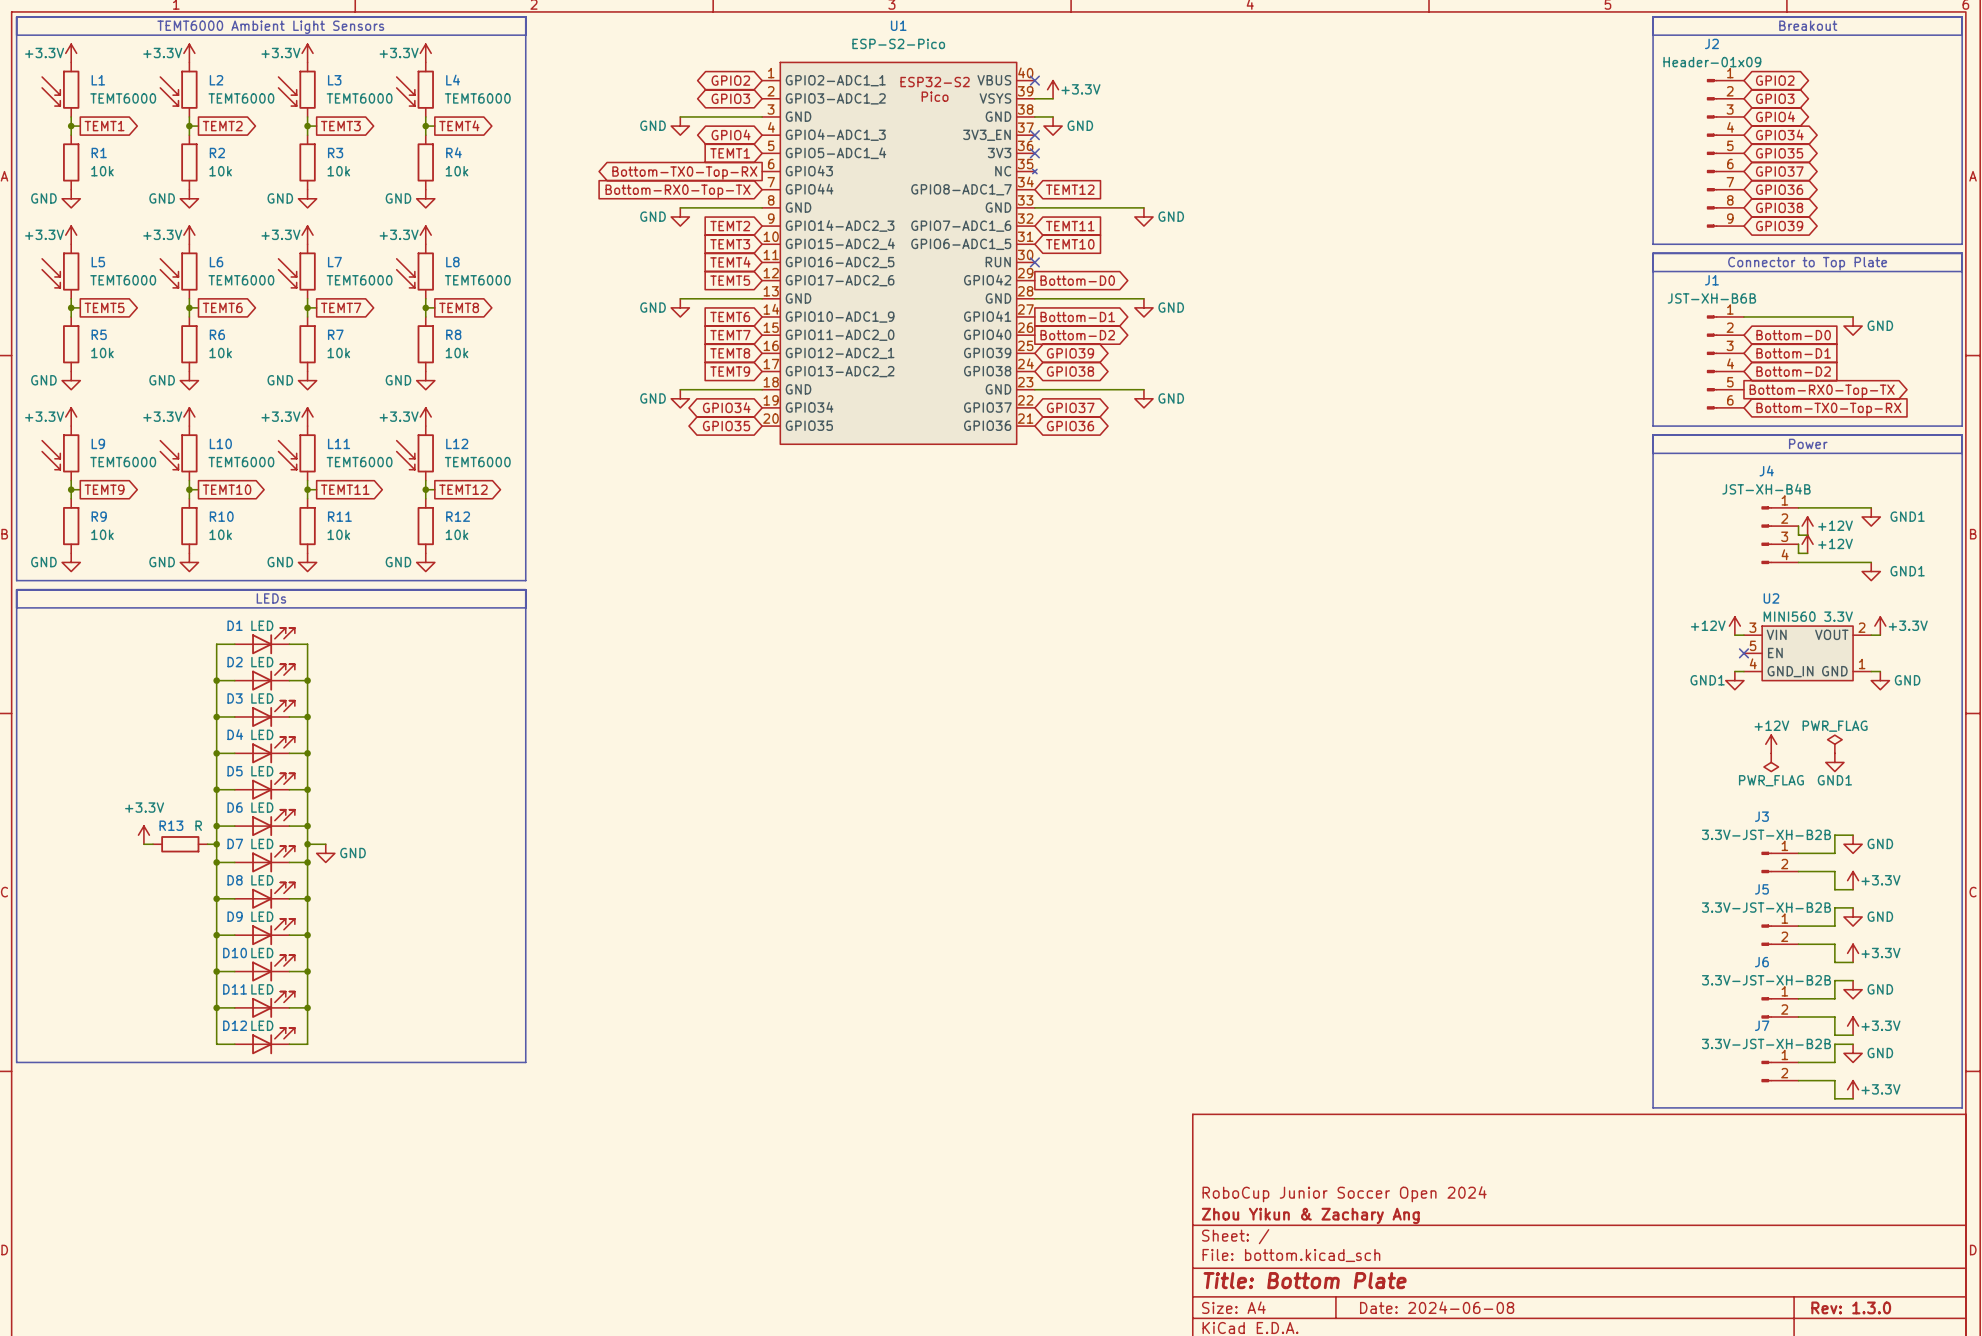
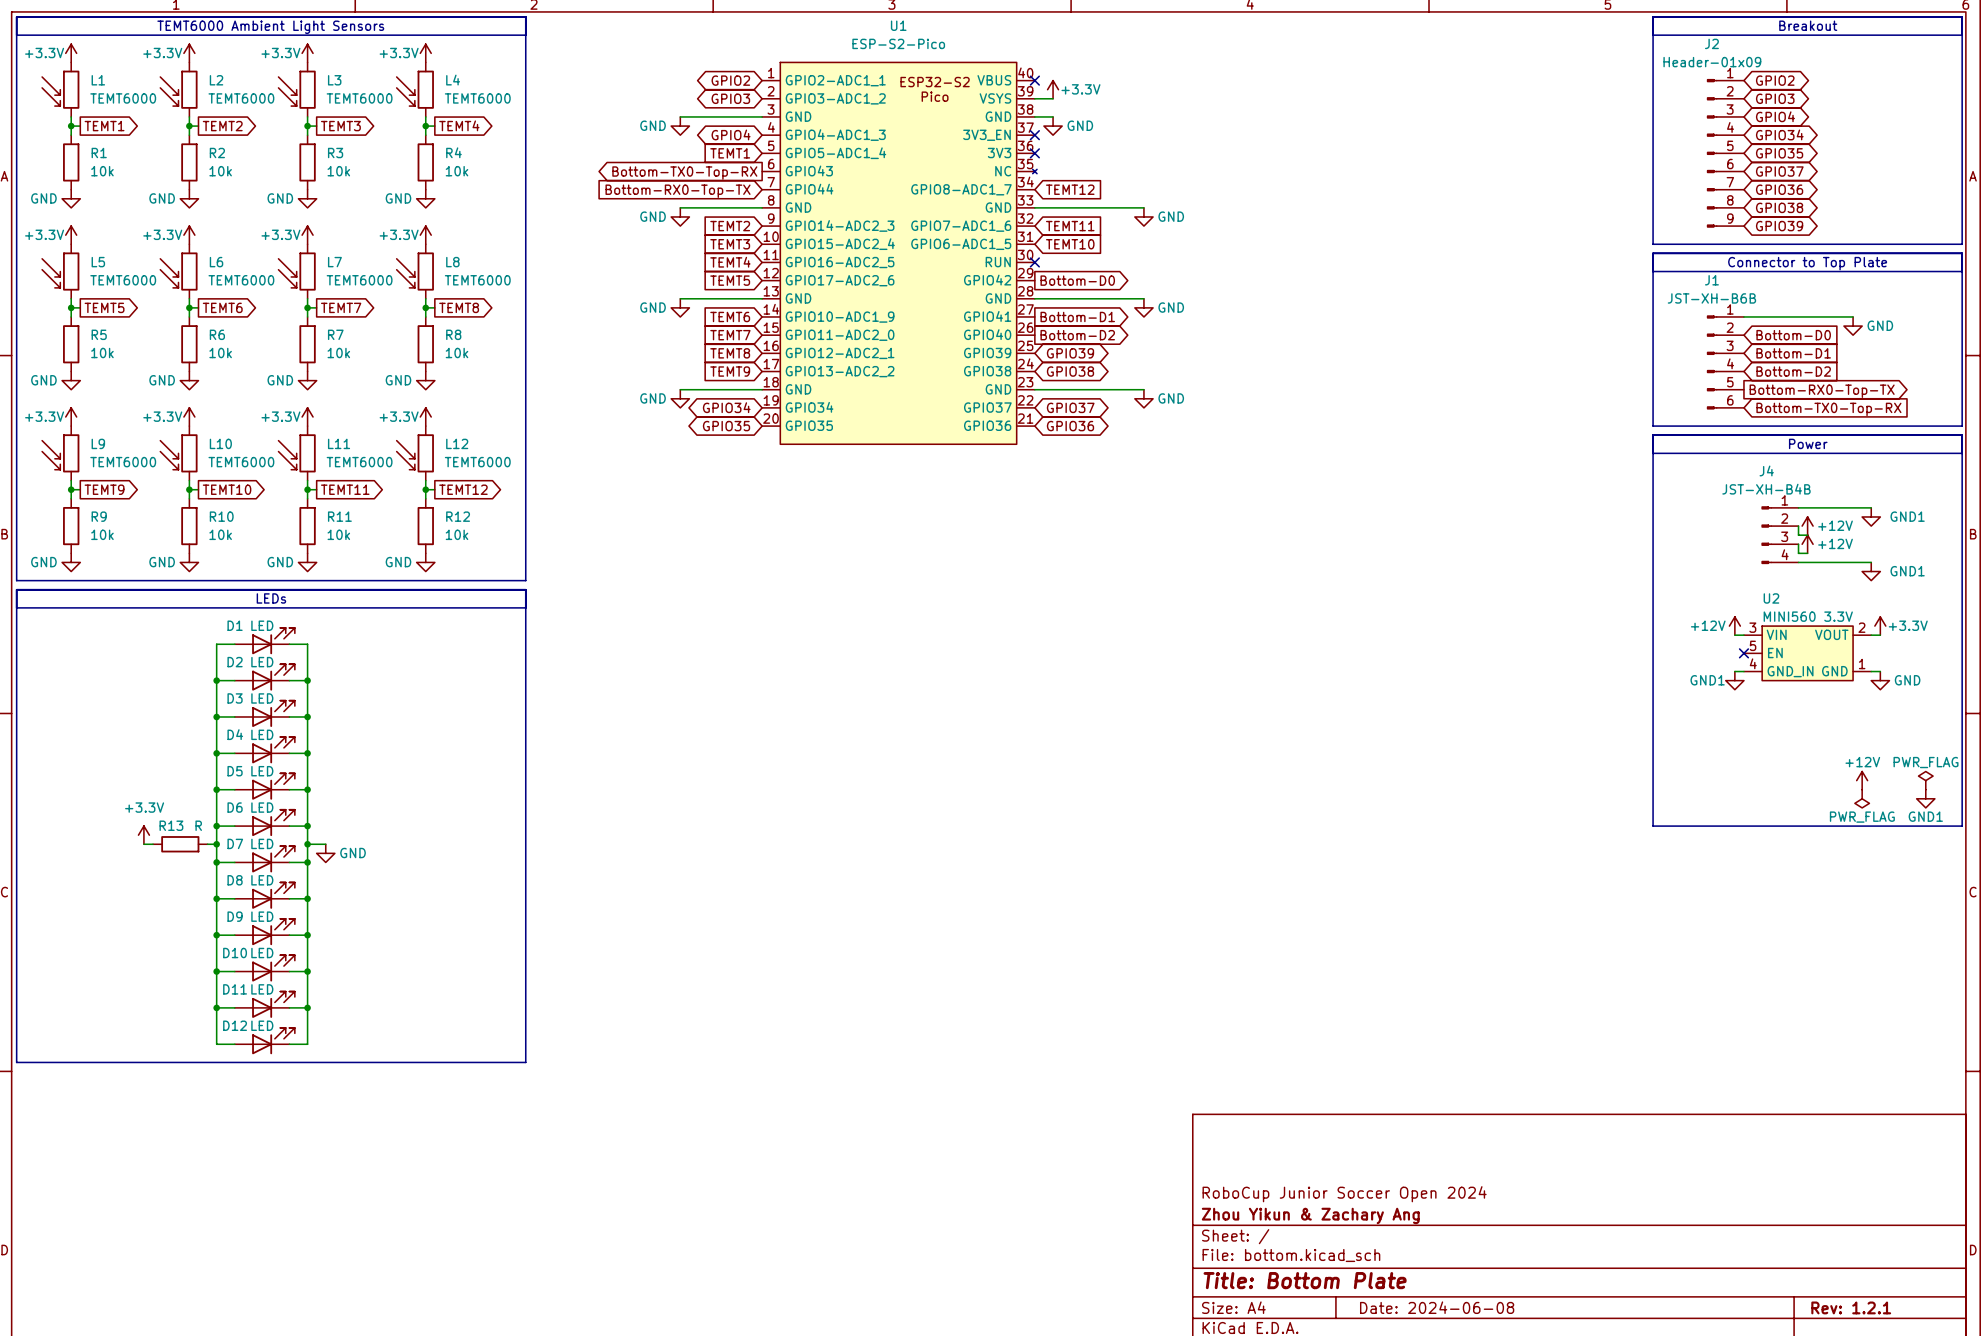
power symbol position: +12V (1771, 744) -> +12V (1862, 780)
power symbol: PWR_FLAG (1834, 744) -> none
power symbol: PWR_FLAG (1771, 762) -> none
power symbol position: GND1 (1834, 762) -> GND1 (1925, 798)
power symbol: none -> PWR_FLAG (1925, 780)
power symbol: none -> PWR_FLAG (1862, 798)
line: (1653, 826) (1653, 1107) (1962, 1107) (1962, 826) -> (1653, 826) (1962, 826)
wire: (1853, 835) (1834, 835) (1834, 853) (1798, 853) -> none
power symbol: GND (1853, 844) -> none
J3: 3.3V-JST-XH-B2B (1780, 862) -> none
wire: (1798, 871) (1834, 871) (1834, 889) (1853, 889) -> none
power symbol: +3.3V (1853, 880) -> none
wire: (1853, 907) (1834, 907) (1834, 926) (1798, 926) -> none
power symbol: GND (1853, 916) -> none
J5: 3.3V-JST-XH-B2B (1780, 935) -> none
wire: (1798, 944) (1834, 944) (1834, 962) (1853, 962) -> none
power symbol: +3.3V (1853, 953) -> none
wire: (1853, 980) (1834, 980) (1834, 998) (1798, 998) -> none
power symbol: GND (1853, 989) -> none
J6: 3.3V-JST-XH-B2B (1780, 1007) -> none
wire: (1798, 1017) (1834, 1017) (1834, 1035) (1853, 1035) -> none
power symbol: +3.3V (1853, 1026) -> none
wire: (1853, 1044) (1834, 1044) (1834, 1062) (1798, 1062) -> none
power symbol: GND (1853, 1053) -> none
J7: 3.3V-JST-XH-B2B (1780, 1071) -> none
wire: (1798, 1080) (1834, 1080) (1834, 1098) (1853, 1098) -> none
power symbol: +3.3V (1853, 1089) -> none
title block: Rev: 1.3.0 (1851, 1307) -> Rev: 1.2.1 (1851, 1307)

